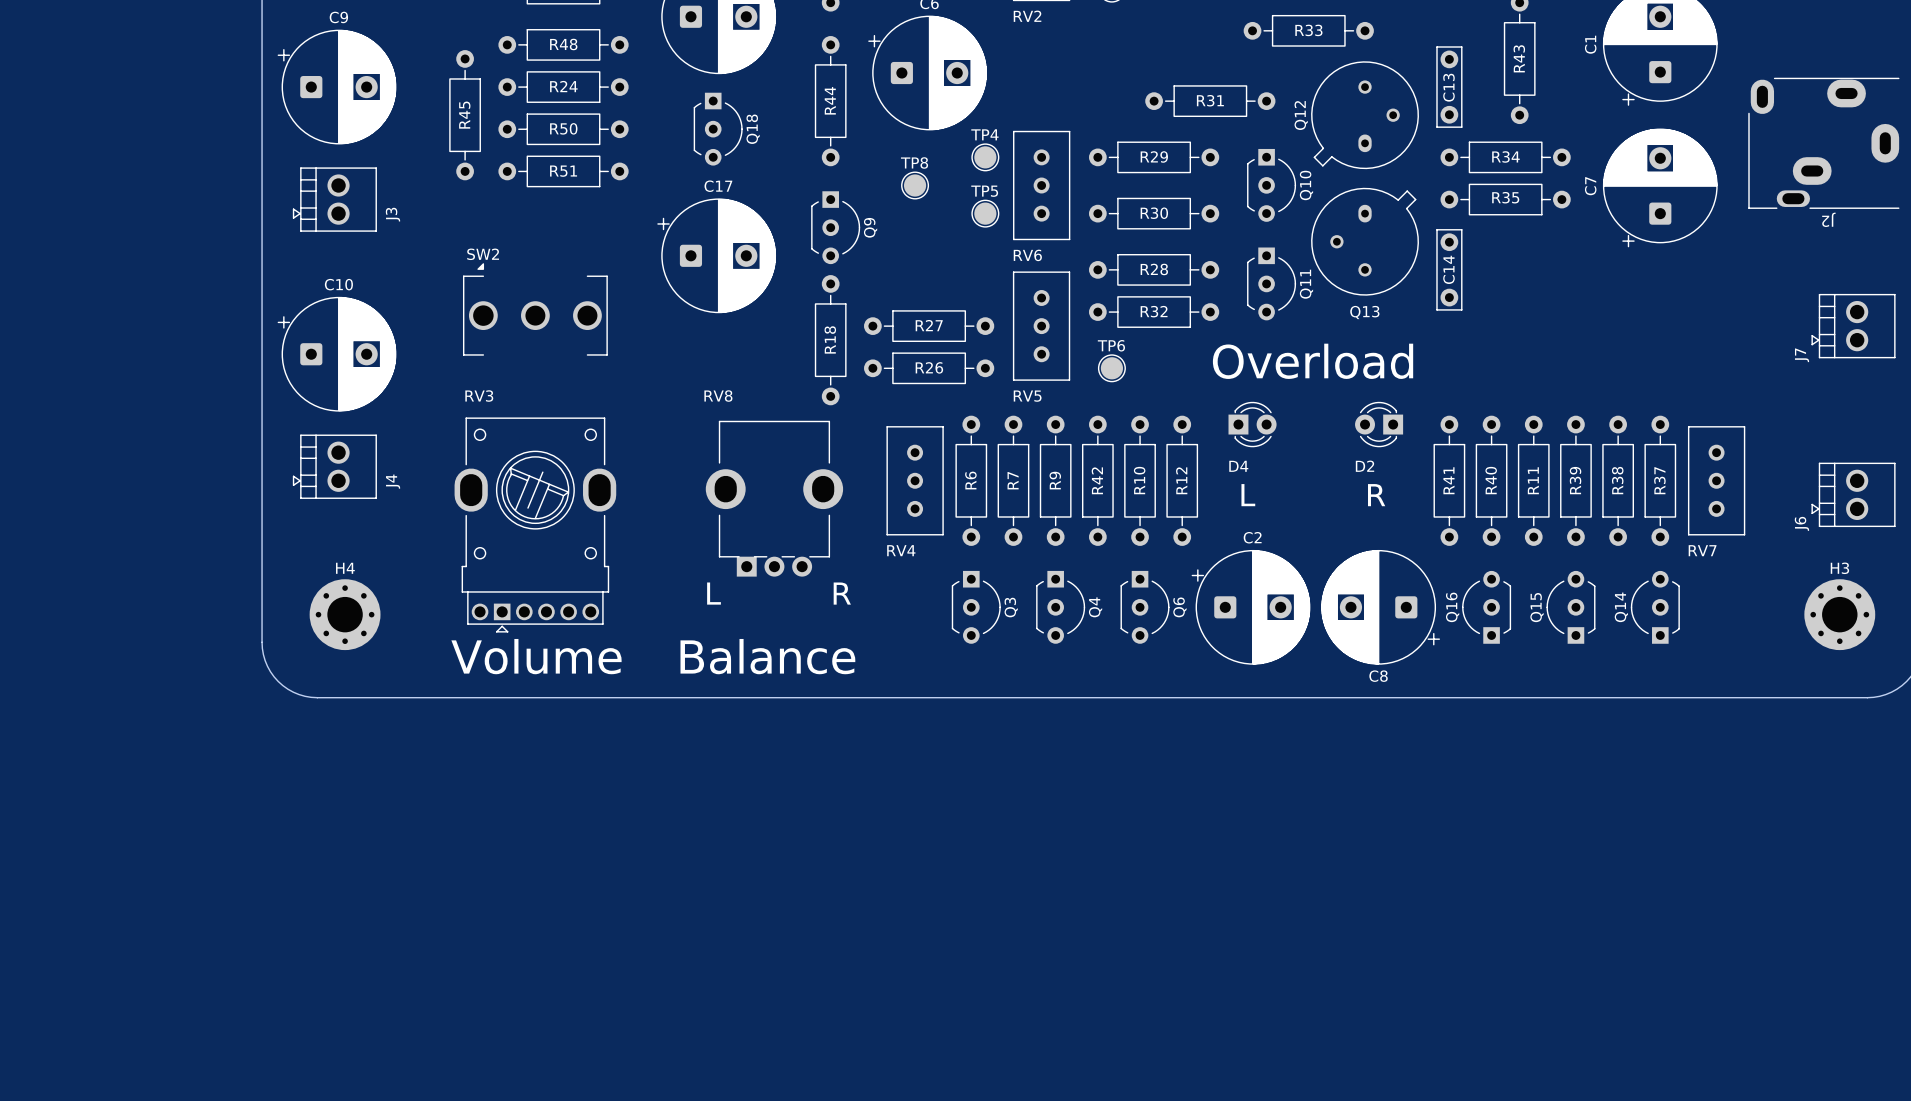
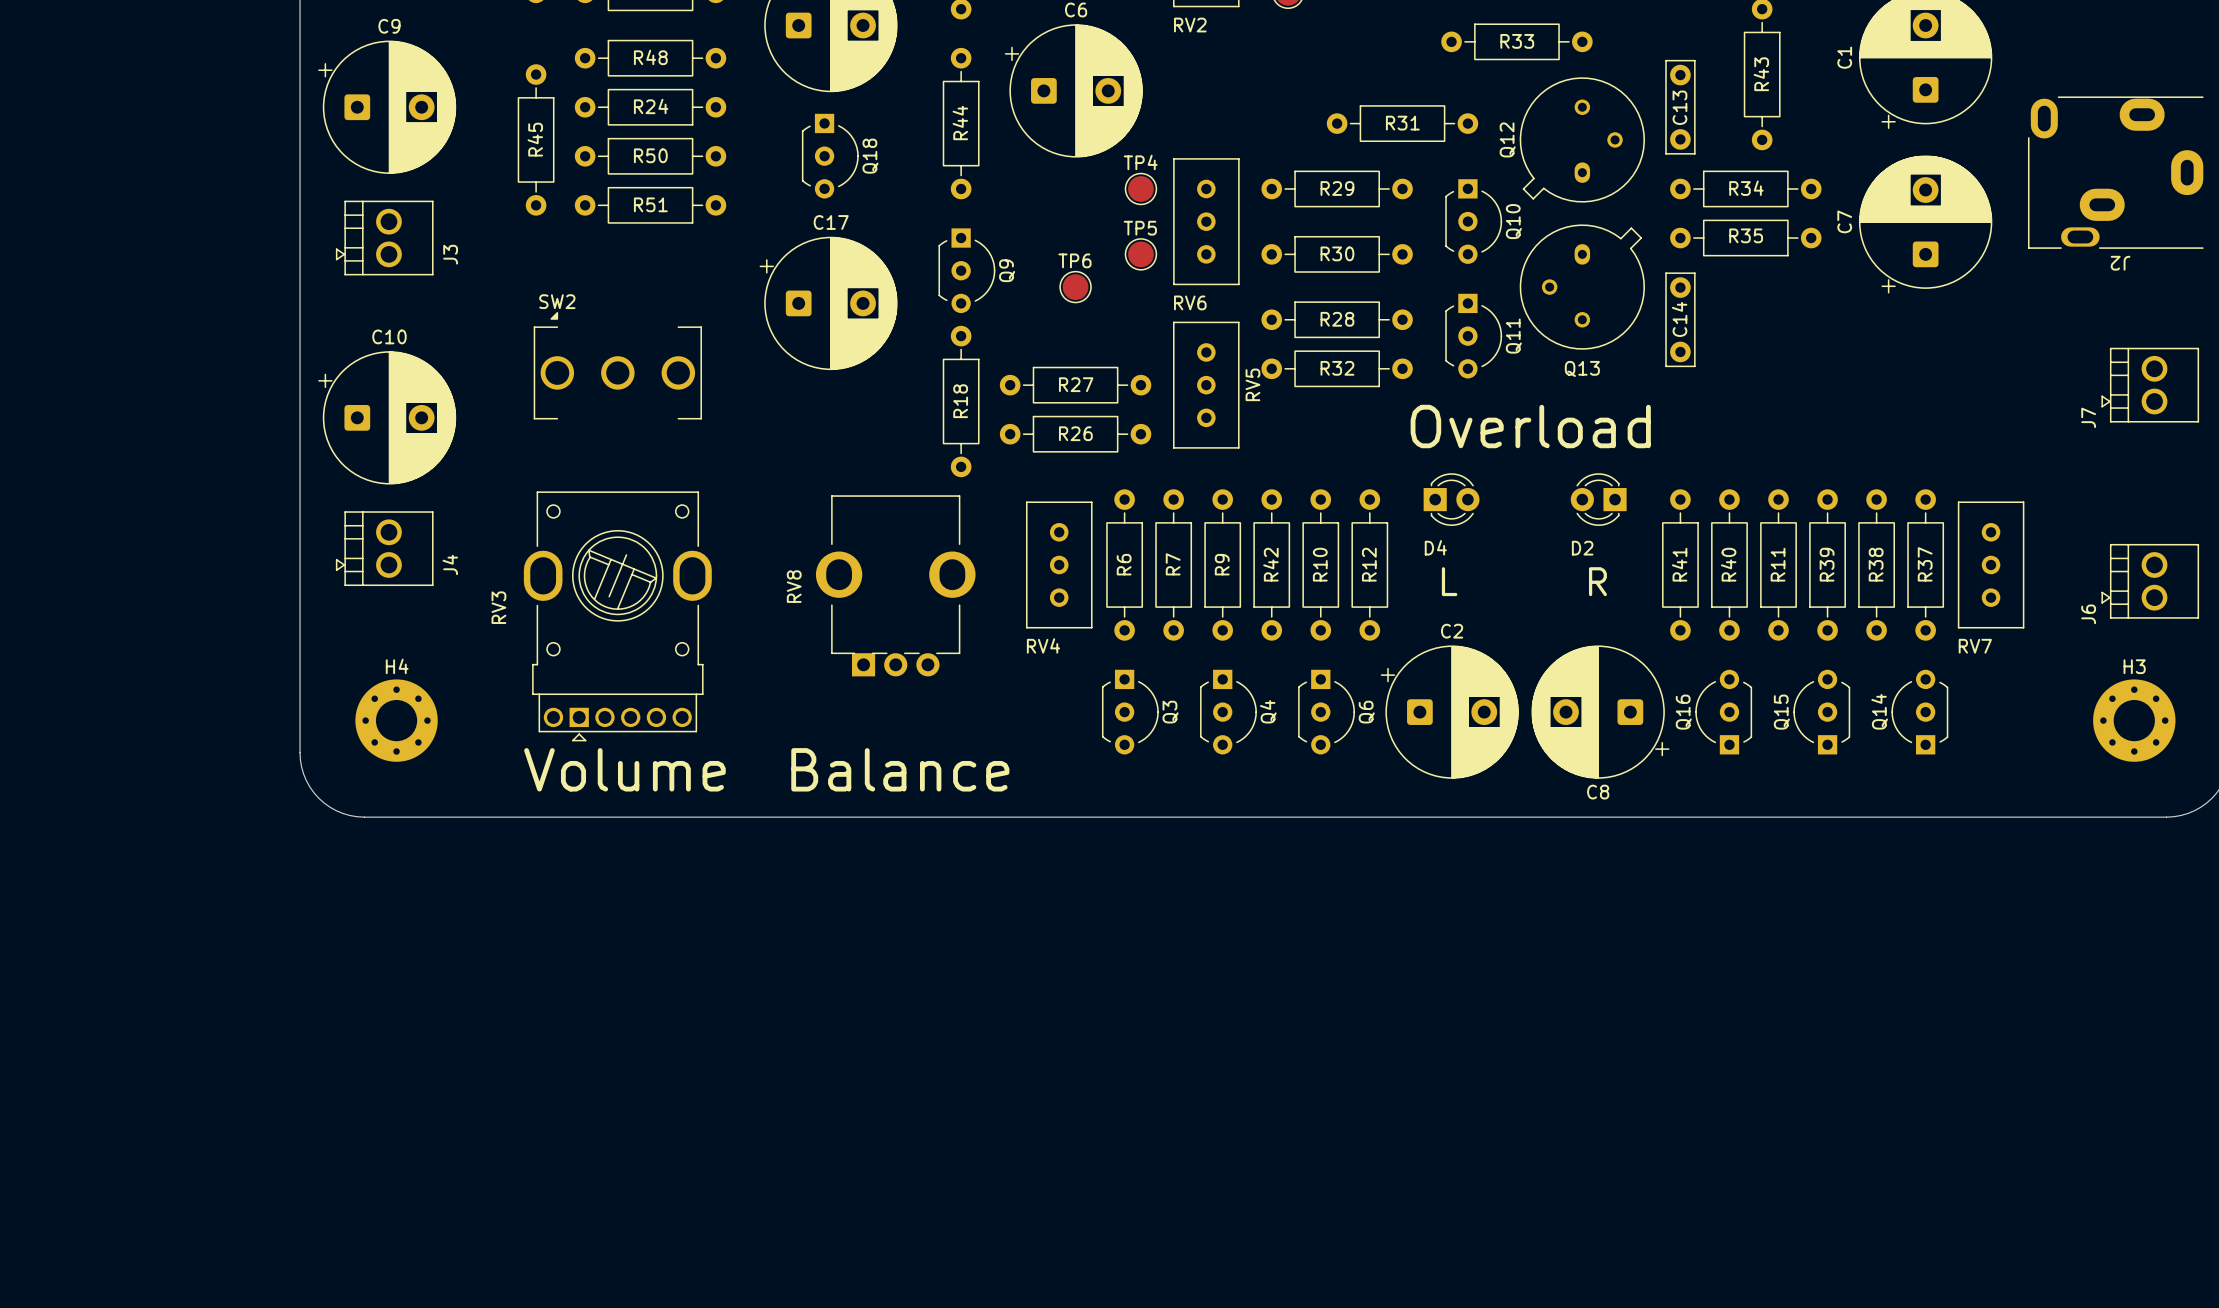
TP8: (915, 185) -> none
TP6 position: (1111, 368) -> (1075, 287)
RV3 name rotation: 0° (479, 396) -> 90° counterclockwise (498, 607)
RV3 name position: RV3 (479, 396) -> RV3 (498, 607)
RV8 name rotation: 0° (718, 396) -> 90° counterclockwise (794, 586)
RV8 name position: RV8 (718, 396) -> RV8 (794, 586)
RV5 name rotation: 0° (1027, 396) -> 90° counterclockwise (1252, 384)
RV5 name position: RV5 (1027, 396) -> RV5 (1252, 384)
text: L (714, 593) -> none
text: R (842, 593) -> none

